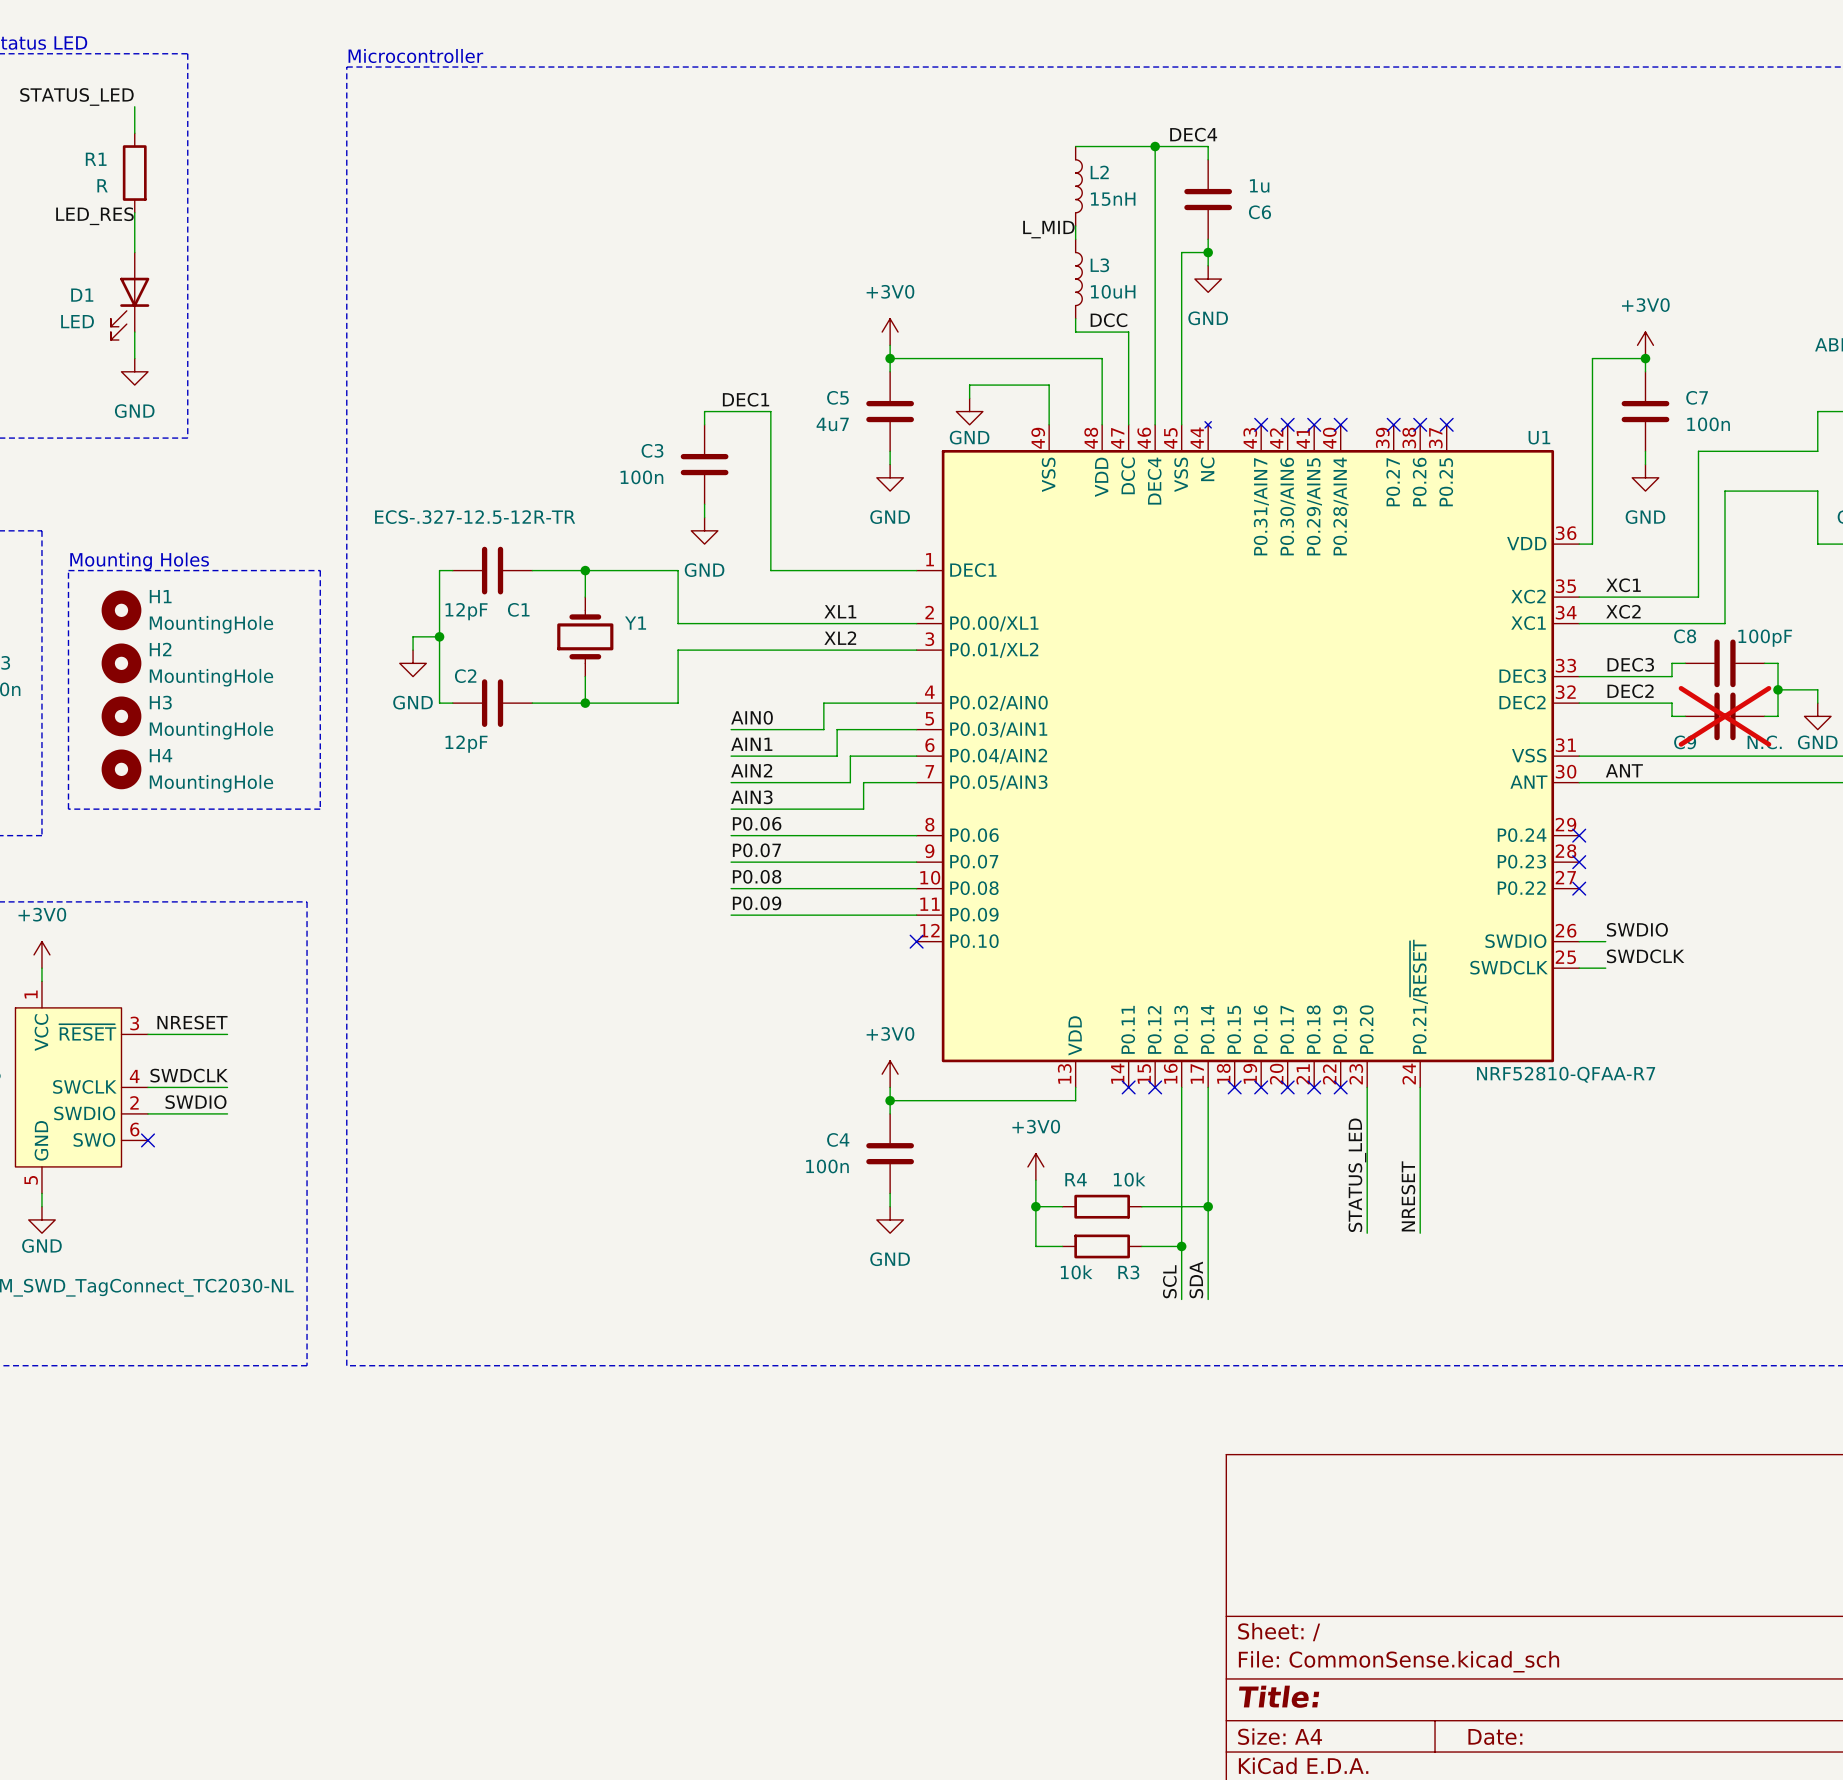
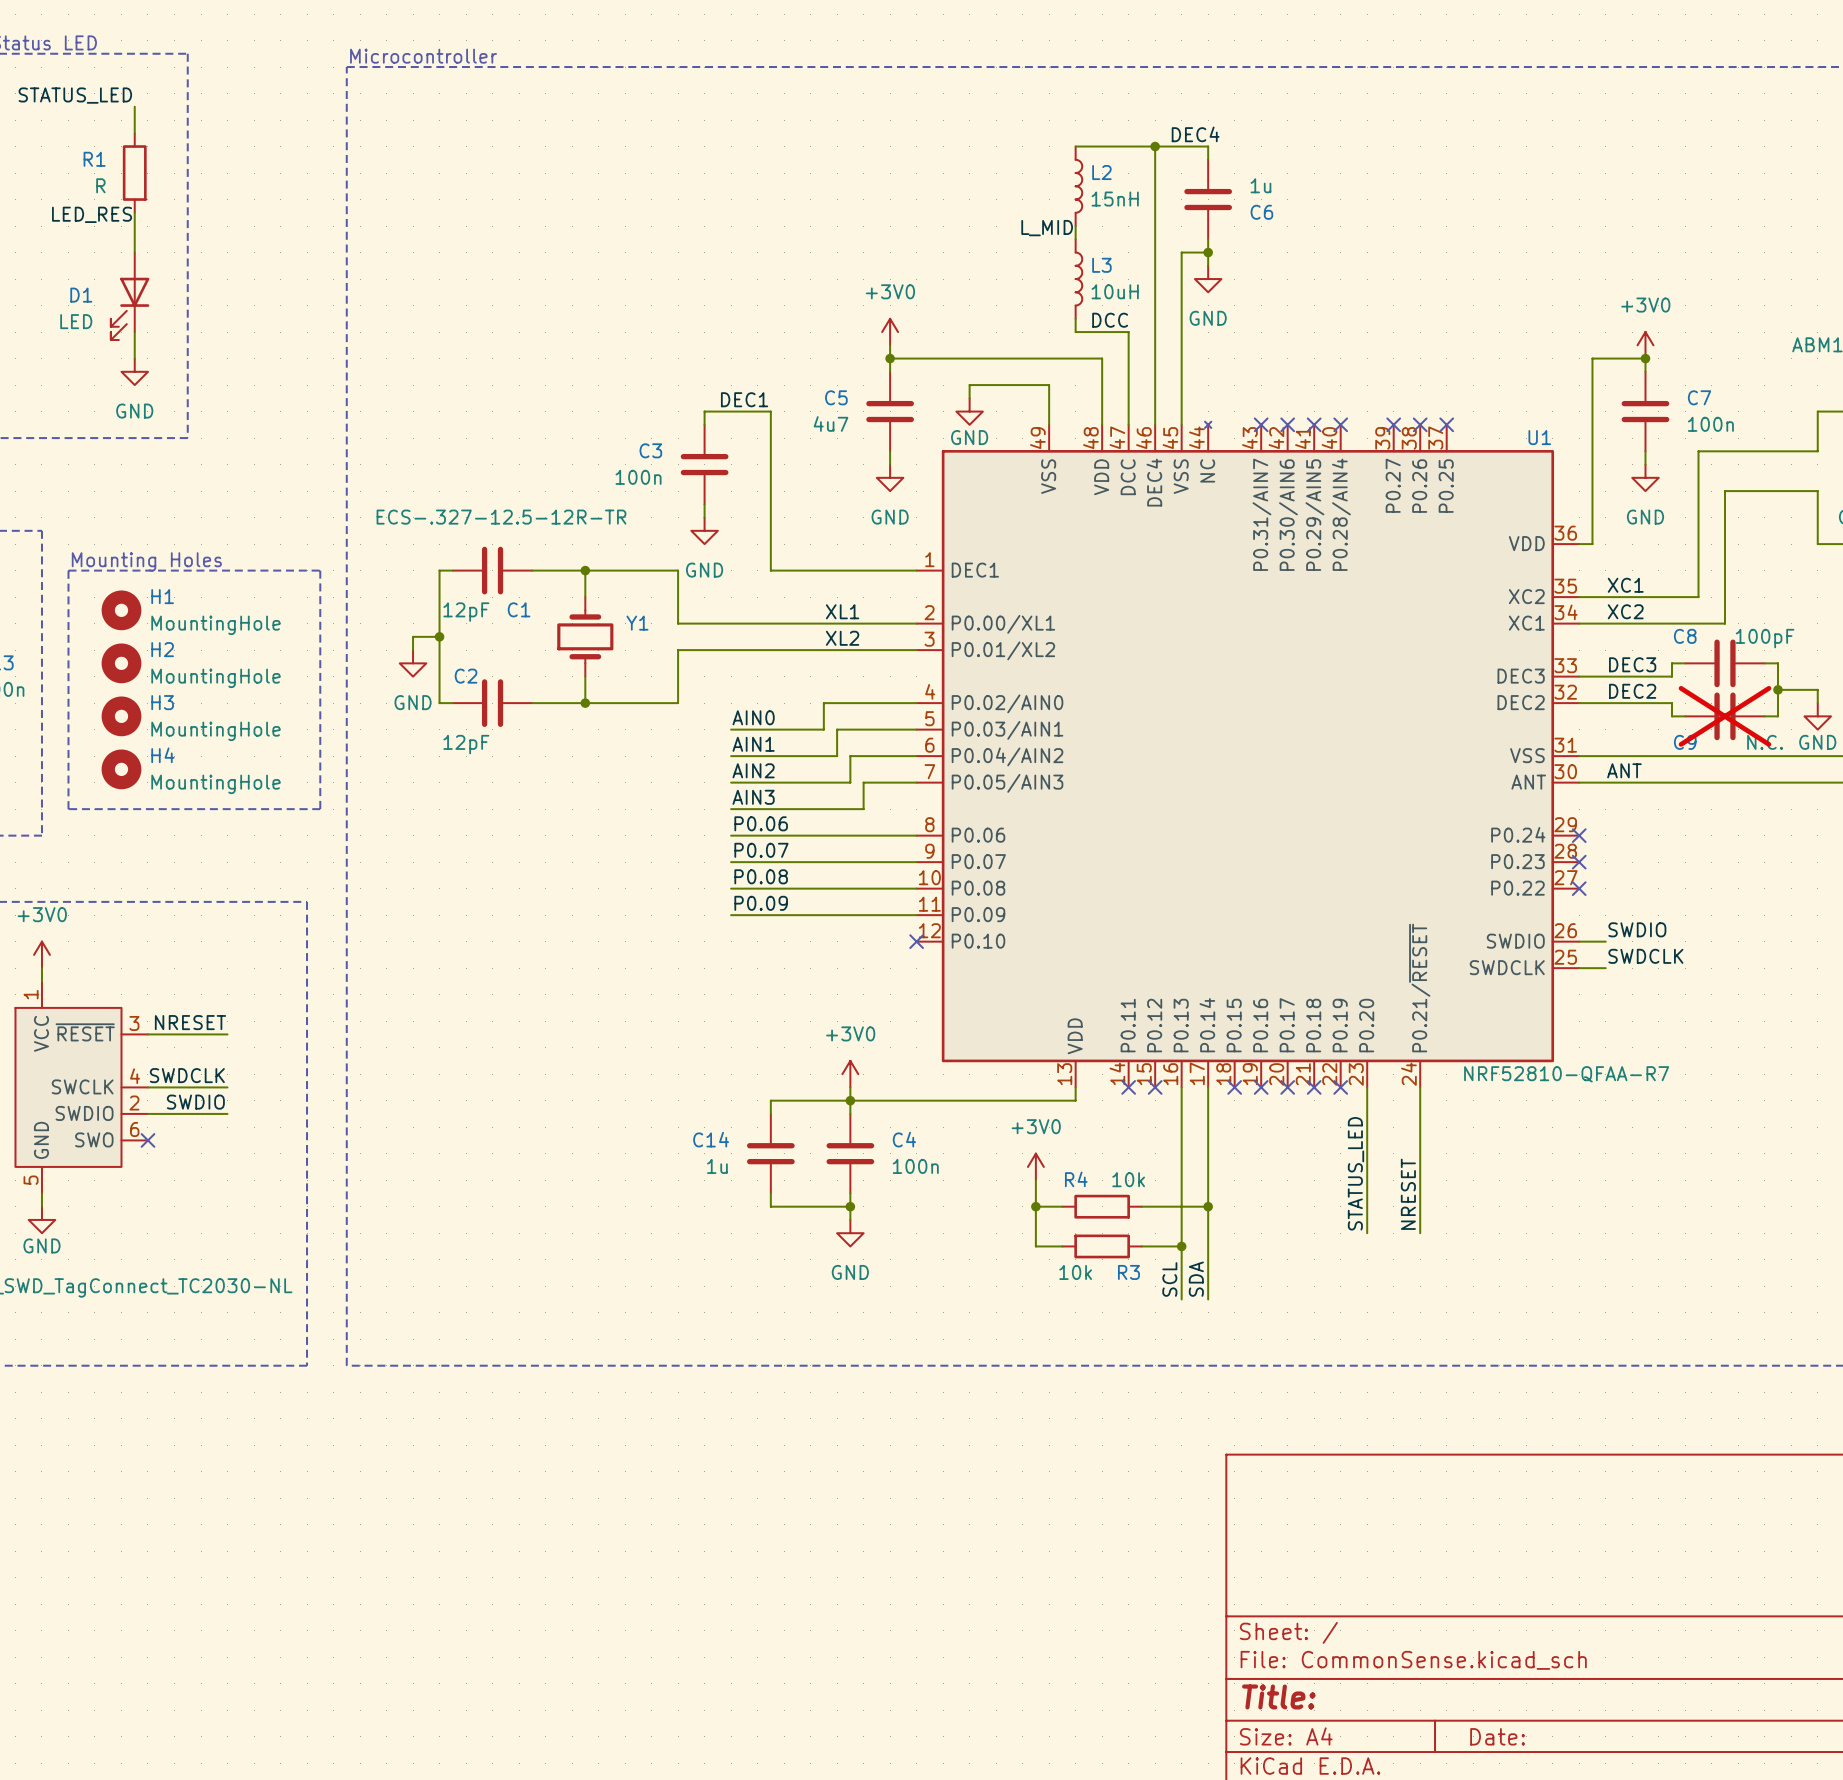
power symbol position: +3V0 (890, 1074) -> +3V0 (850, 1074)
wire: (890, 1087) (890, 1113) -> (850, 1087) (850, 1113)
wire: none -> (890, 1100) (770, 1100) (770, 1113)
junction position: (890, 1100) -> (850, 1100)
C4 name position: C4 (838, 1139) -> C4 (904, 1139)
C14: none -> 1u (770, 1153)
C4 position: (890, 1153) -> (850, 1153)
C4 value position: 100n (827, 1166) -> 100n (915, 1166)
wire: none -> (770, 1193) (770, 1206) (850, 1206)
wire: none -> (850, 1193) (850, 1219)
wire: (890, 1193) (890, 1206) -> none
junction: none -> (850, 1206)
power symbol position: GND (890, 1219) -> GND (850, 1233)

